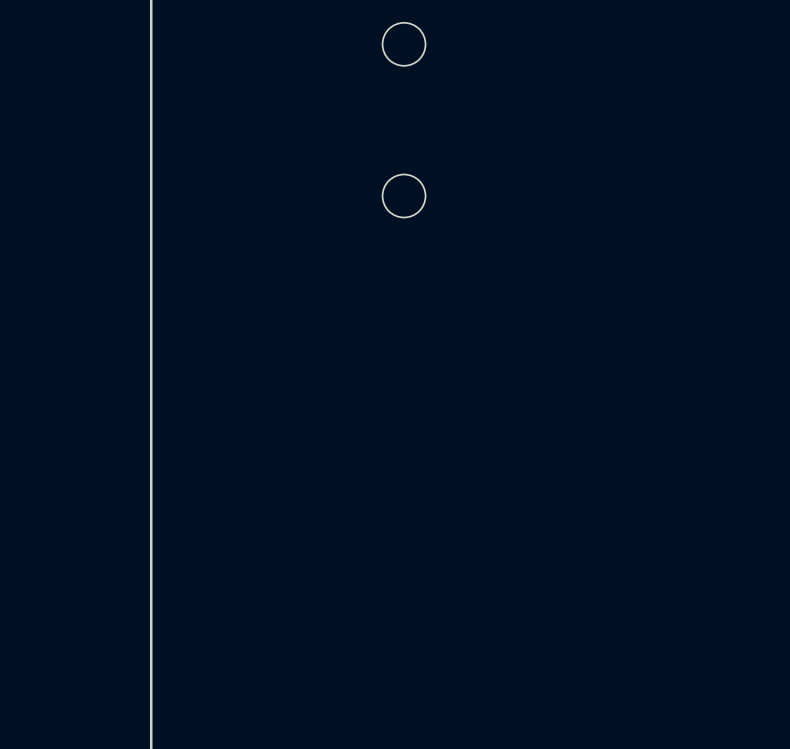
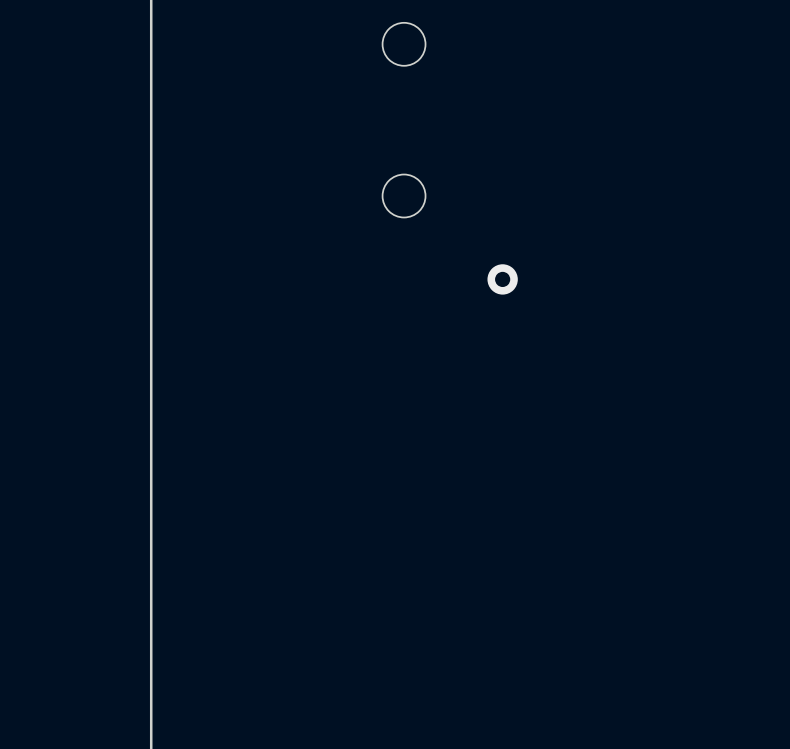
via: none -> (502, 279)

